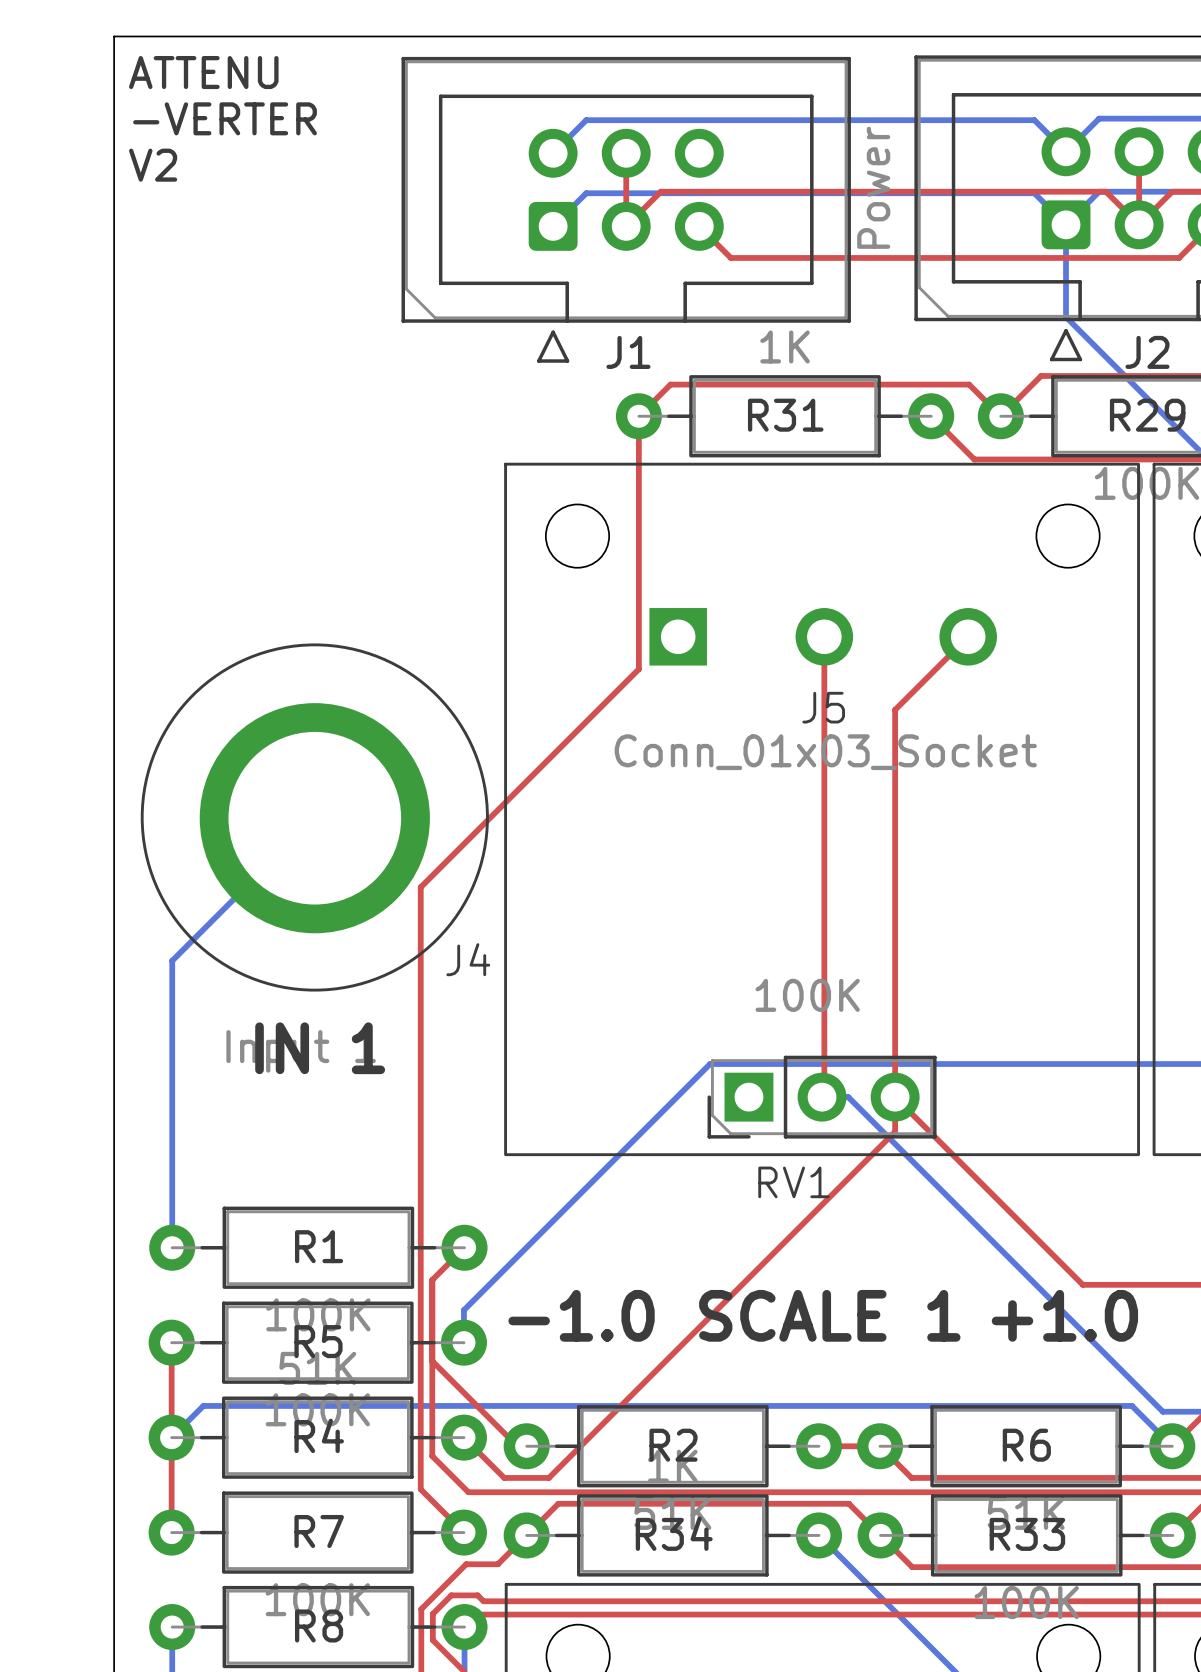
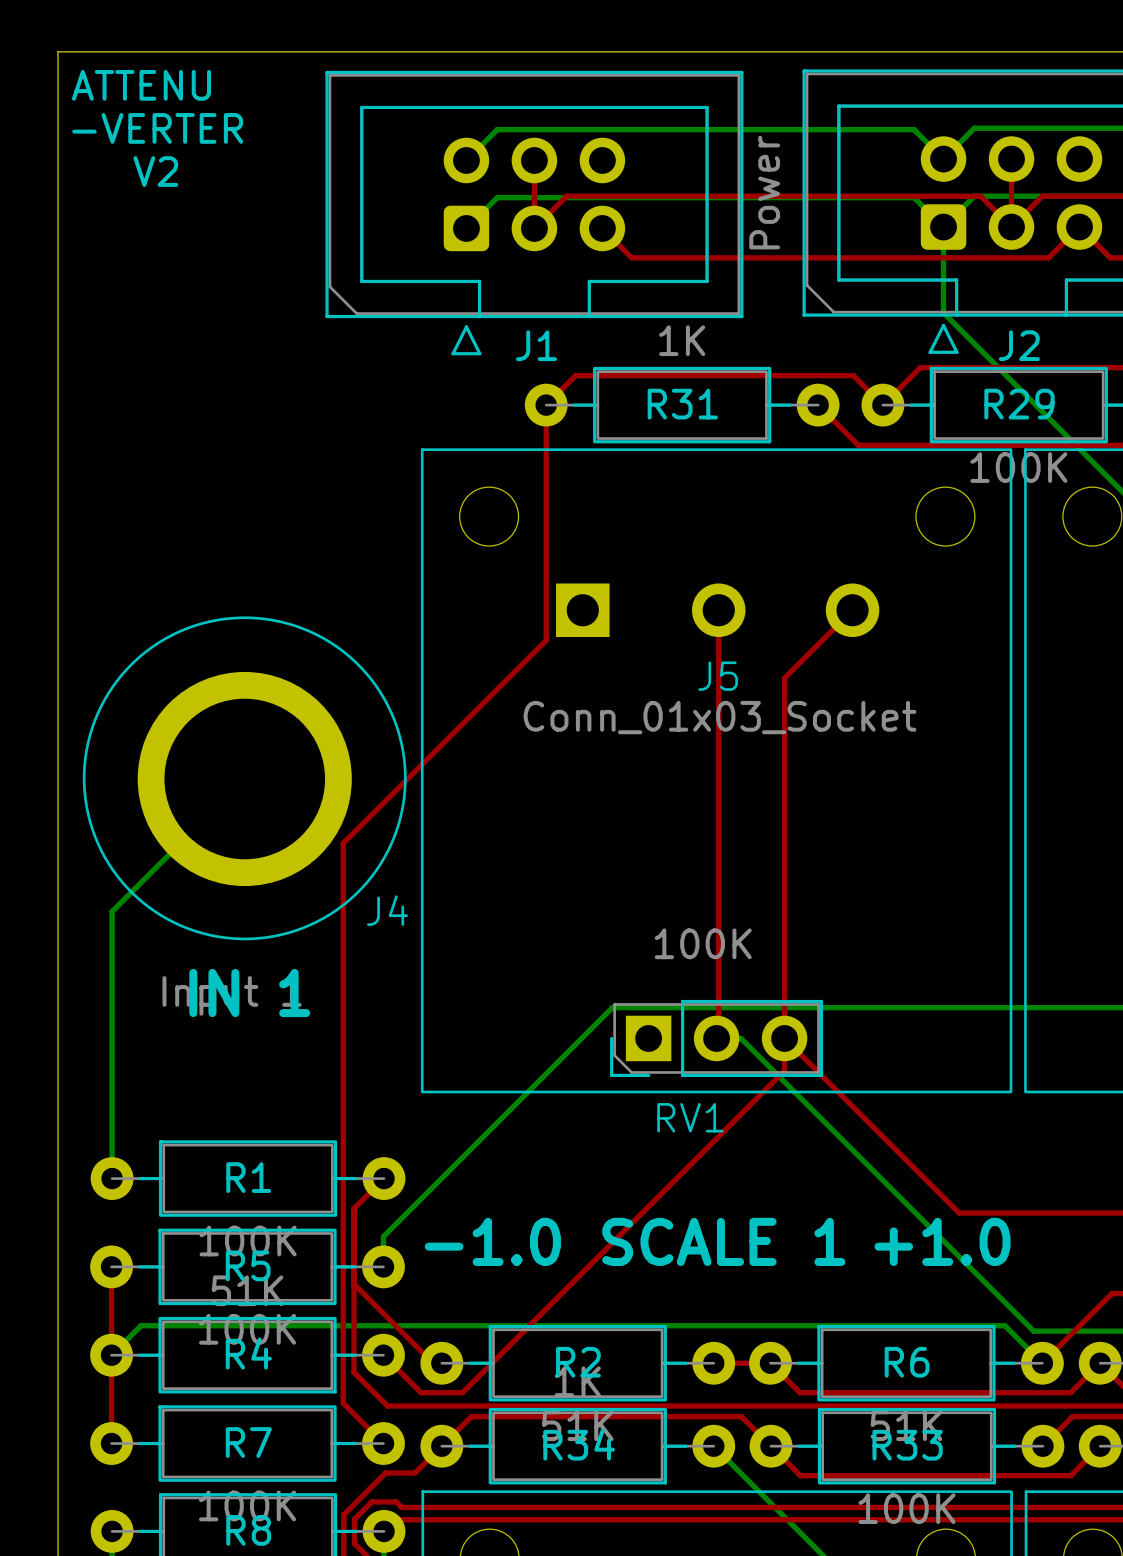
text position: -VERTER (225, 118) -> -VERTER (157, 128)
text position: V2 (153, 165) -> V2 (155, 171)

